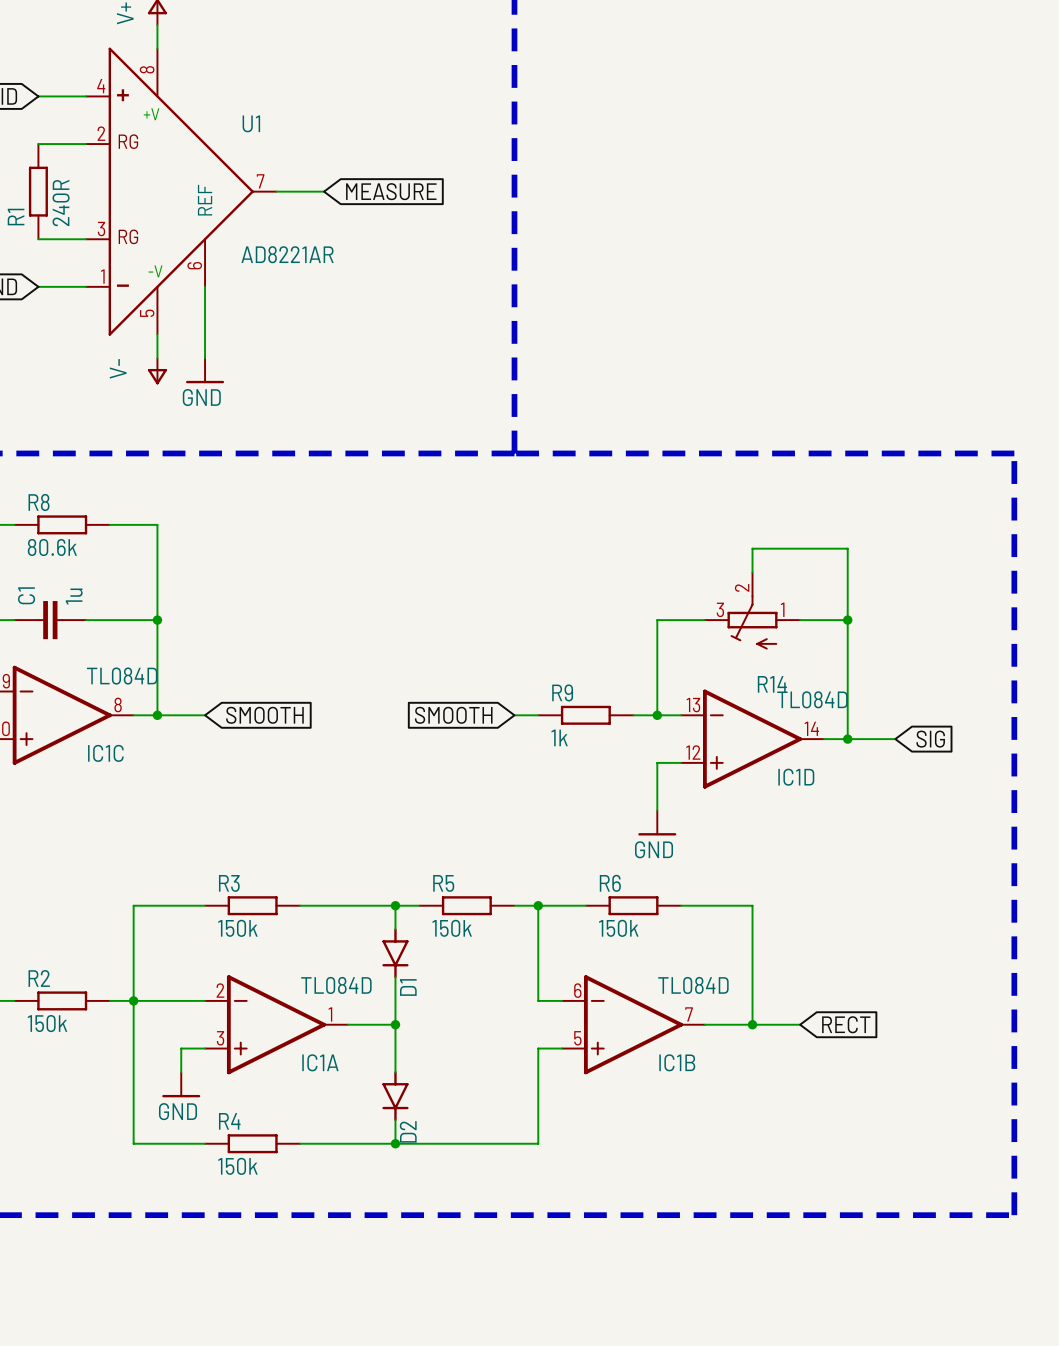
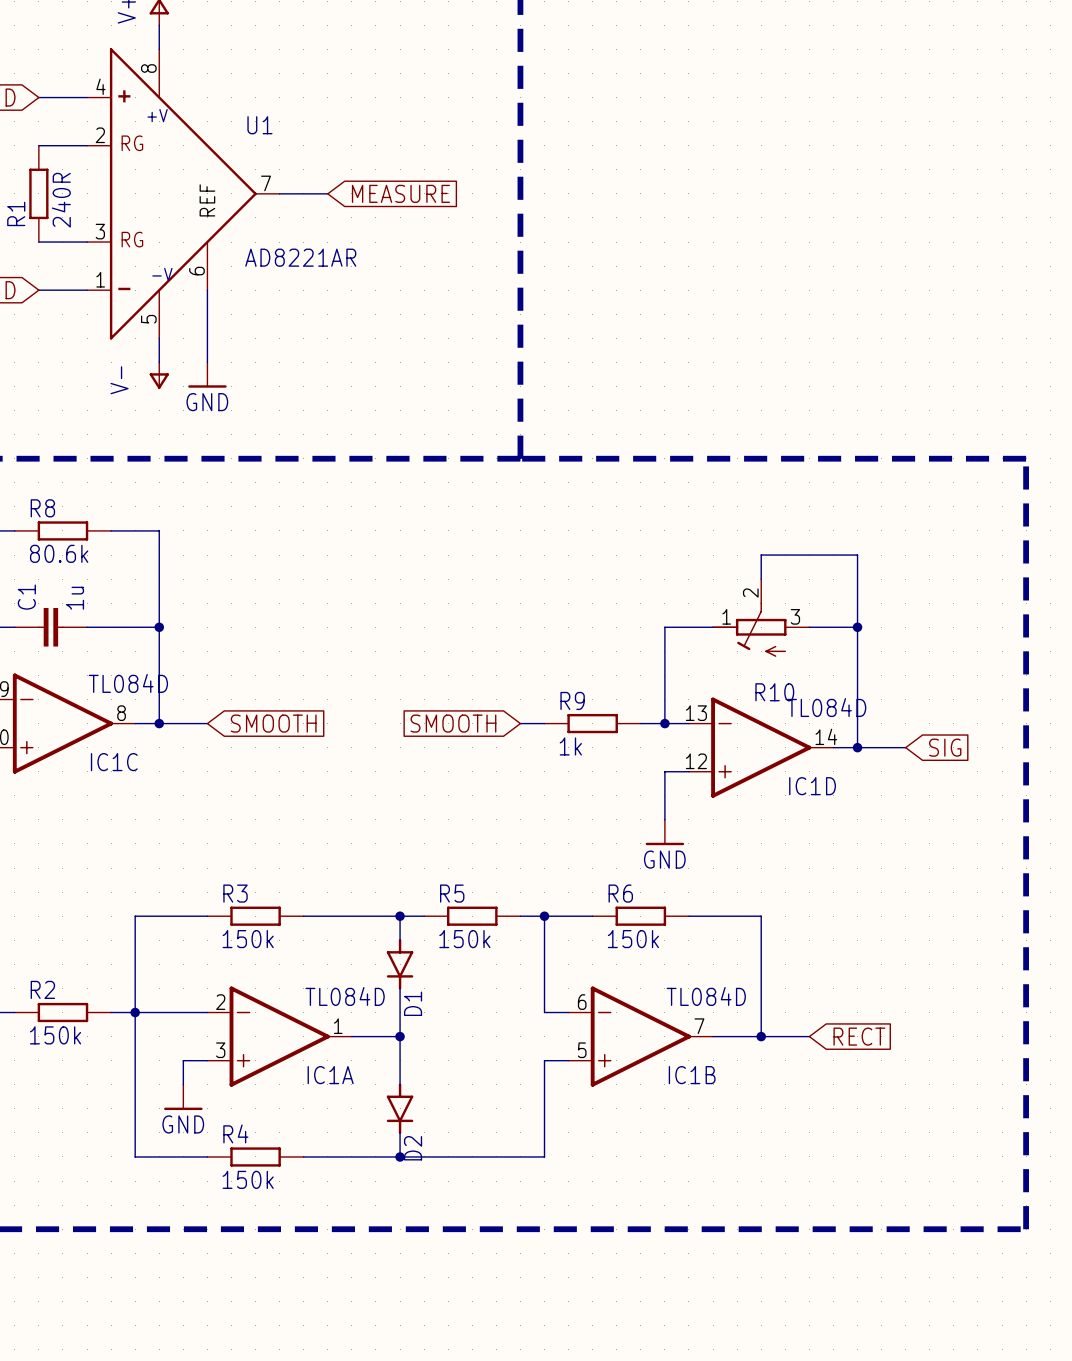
R14: (752, 610) -> none
R10: none -> (760, 618)

